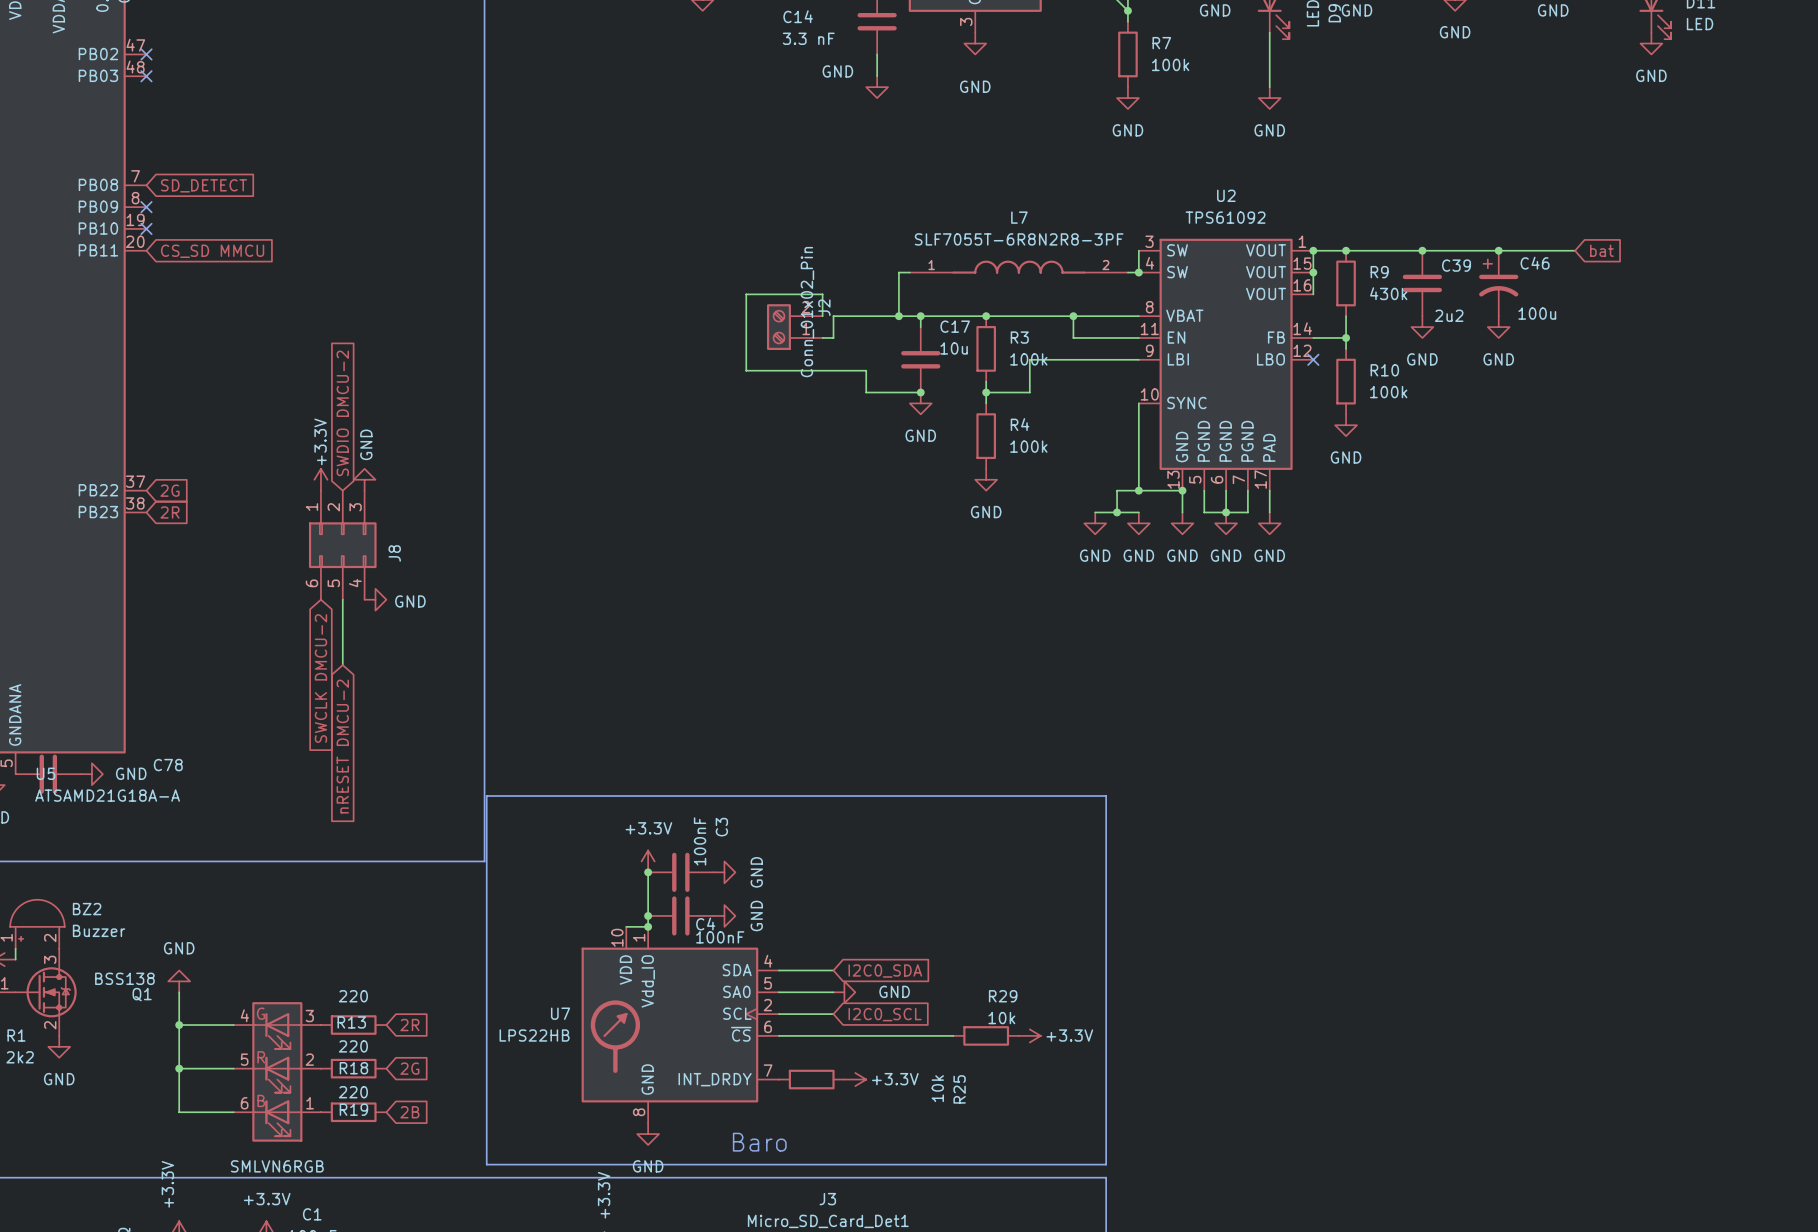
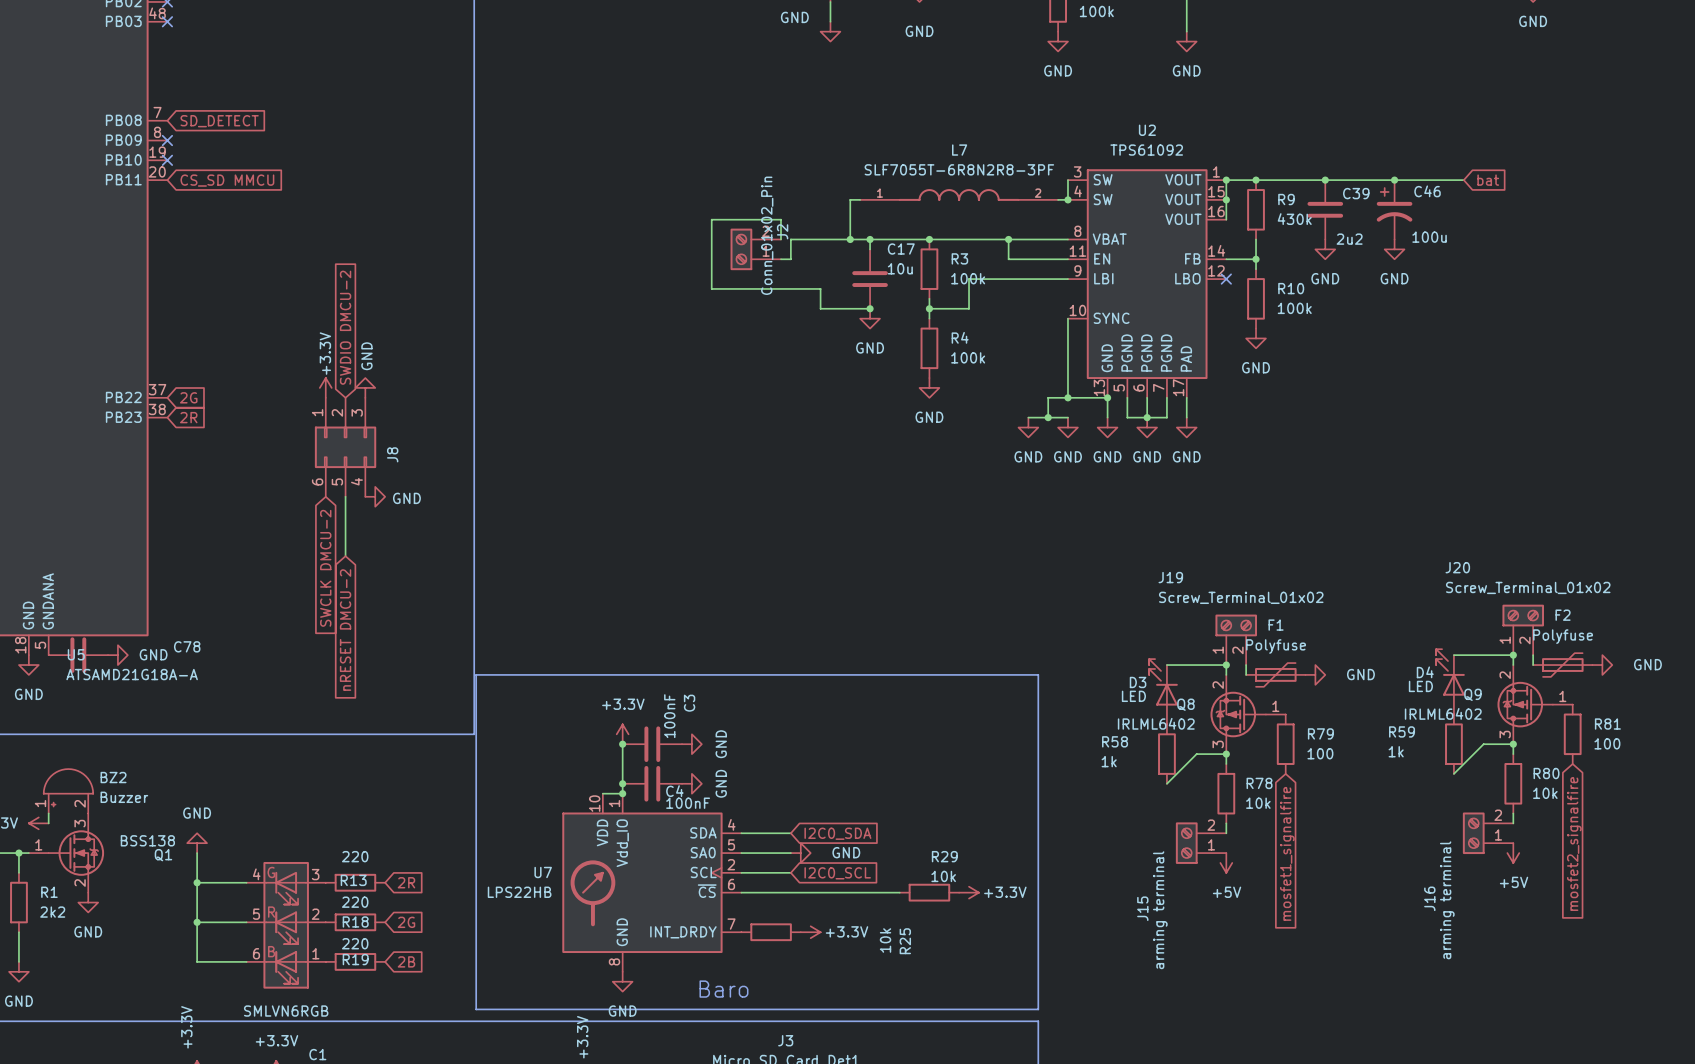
J20: none -> Screw_Terminal_01x02 (1523, 629)
J19: none -> Screw_Terminal_01x02 (1236, 639)
wire: none -> (1453, 655) (1513, 655) (1513, 665)
junction: none -> (1513, 655)
wire: none -> (1533, 655) (1533, 665)
wire: none -> (1166, 665) (1226, 665) (1226, 674)
junction: none -> (1226, 665)
wire: none -> (1246, 665) (1246, 674)
F2: none -> Polyfuse (1562, 665)
power symbol: none -> GND (1602, 665)
F1: none -> Polyfuse (1275, 674)
power symbol: none -> GND (1315, 674)
D4: none -> LED (1450, 681)
D3: none -> LED (1163, 691)
Q9: none -> IRLML6402 (1535, 704)
Q8: none -> IRLML6402 (1248, 714)
R81: none -> 100 (1572, 734)
R79: none -> 100 (1285, 744)
R59: none -> 1k (1453, 744)
junction: none -> (1513, 744)
R58: none -> 1k (1166, 754)
junction: none -> (1226, 754)
wire: none -> (1513, 754) (1513, 744) (1483, 744) (1453, 773)
wire: none -> (1226, 763) (1226, 754) (1196, 754) (1166, 783)
R80: none -> 10k (1513, 783)
R78: none -> 10k (1226, 793)
wire: none -> (1513, 813) (1513, 823)
wire: none -> (1226, 823) (1226, 833)
J16: none -> arming terminal (1488, 833)
J15: none -> arming terminal (1201, 843)
global label: none -> mosfet2_signalfire (1574, 844)
power symbol: none -> +5V (1513, 853)
global label: none -> mosfet1_signalfire (1287, 853)
power symbol: none -> +5V (1226, 862)

